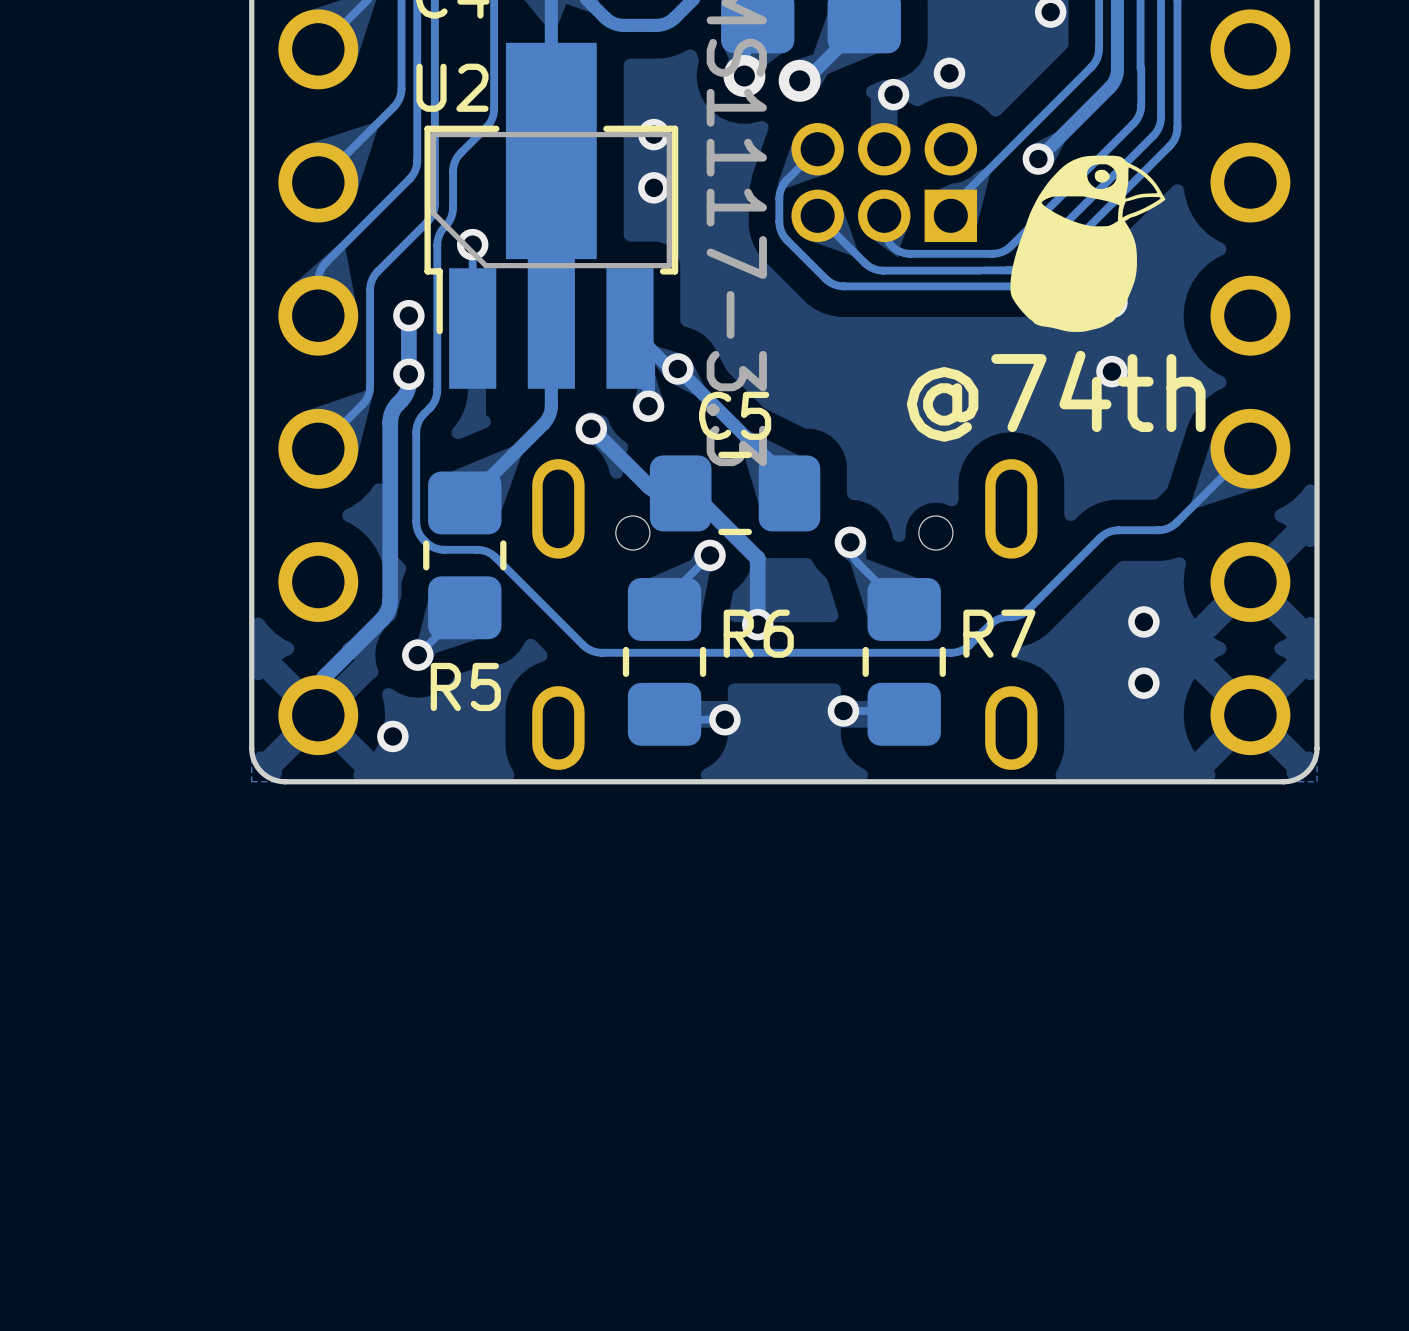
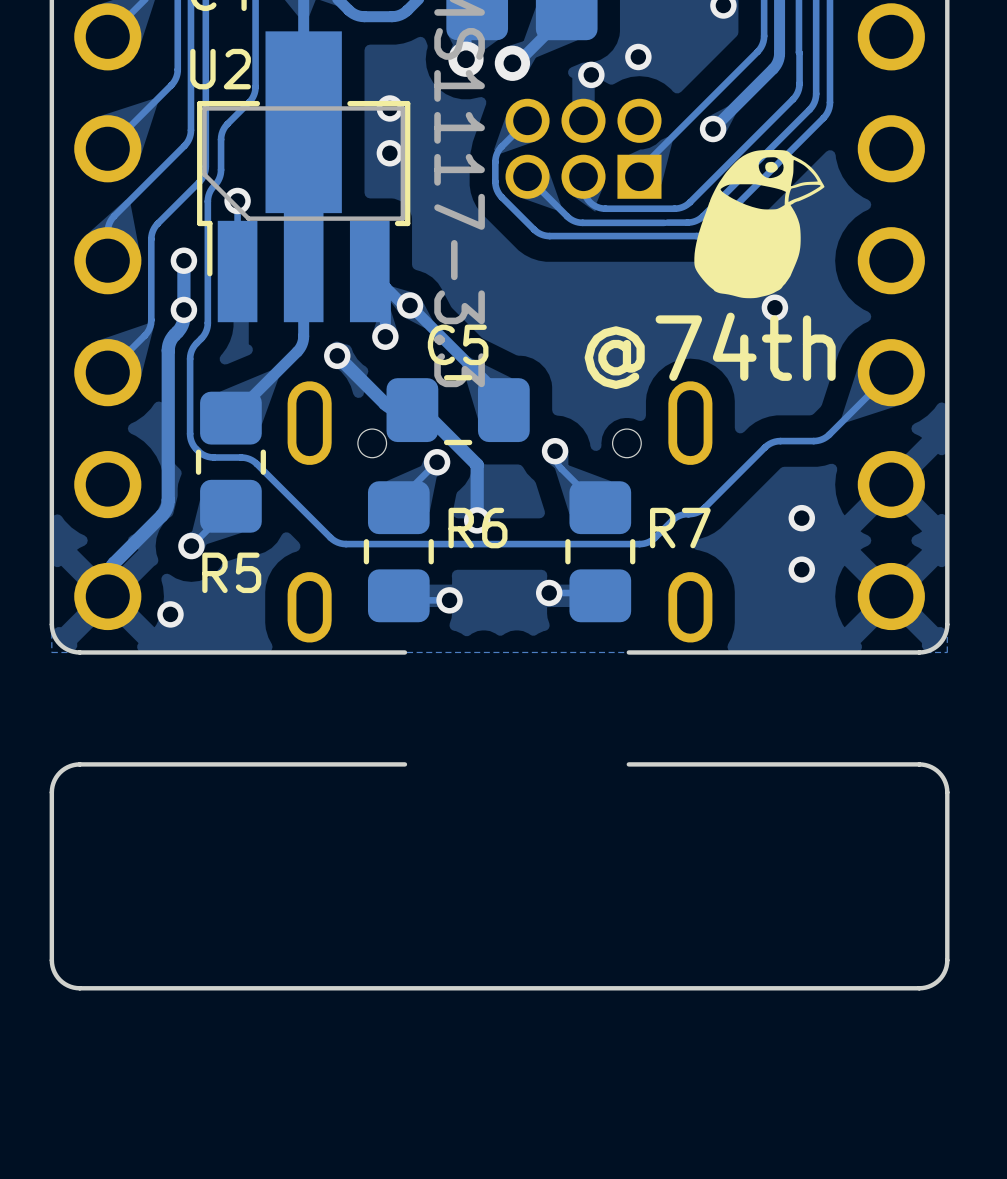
drawing position: (1087, 243) -> (759, 224)
drawing position: (1056, 396) -> (710, 350)
board edge: (938, 781) (671, 781) -> none
board edge: none -> (628, 764) (919, 764) (934, 768) (943, 777) (947, 792) (947, 960) (943, 975) (934, 983) (919, 988) (79, 988) (64, 983) (56, 975) (51, 960) (51, 792) (56, 777) (64, 768) (79, 764) (404, 764)

